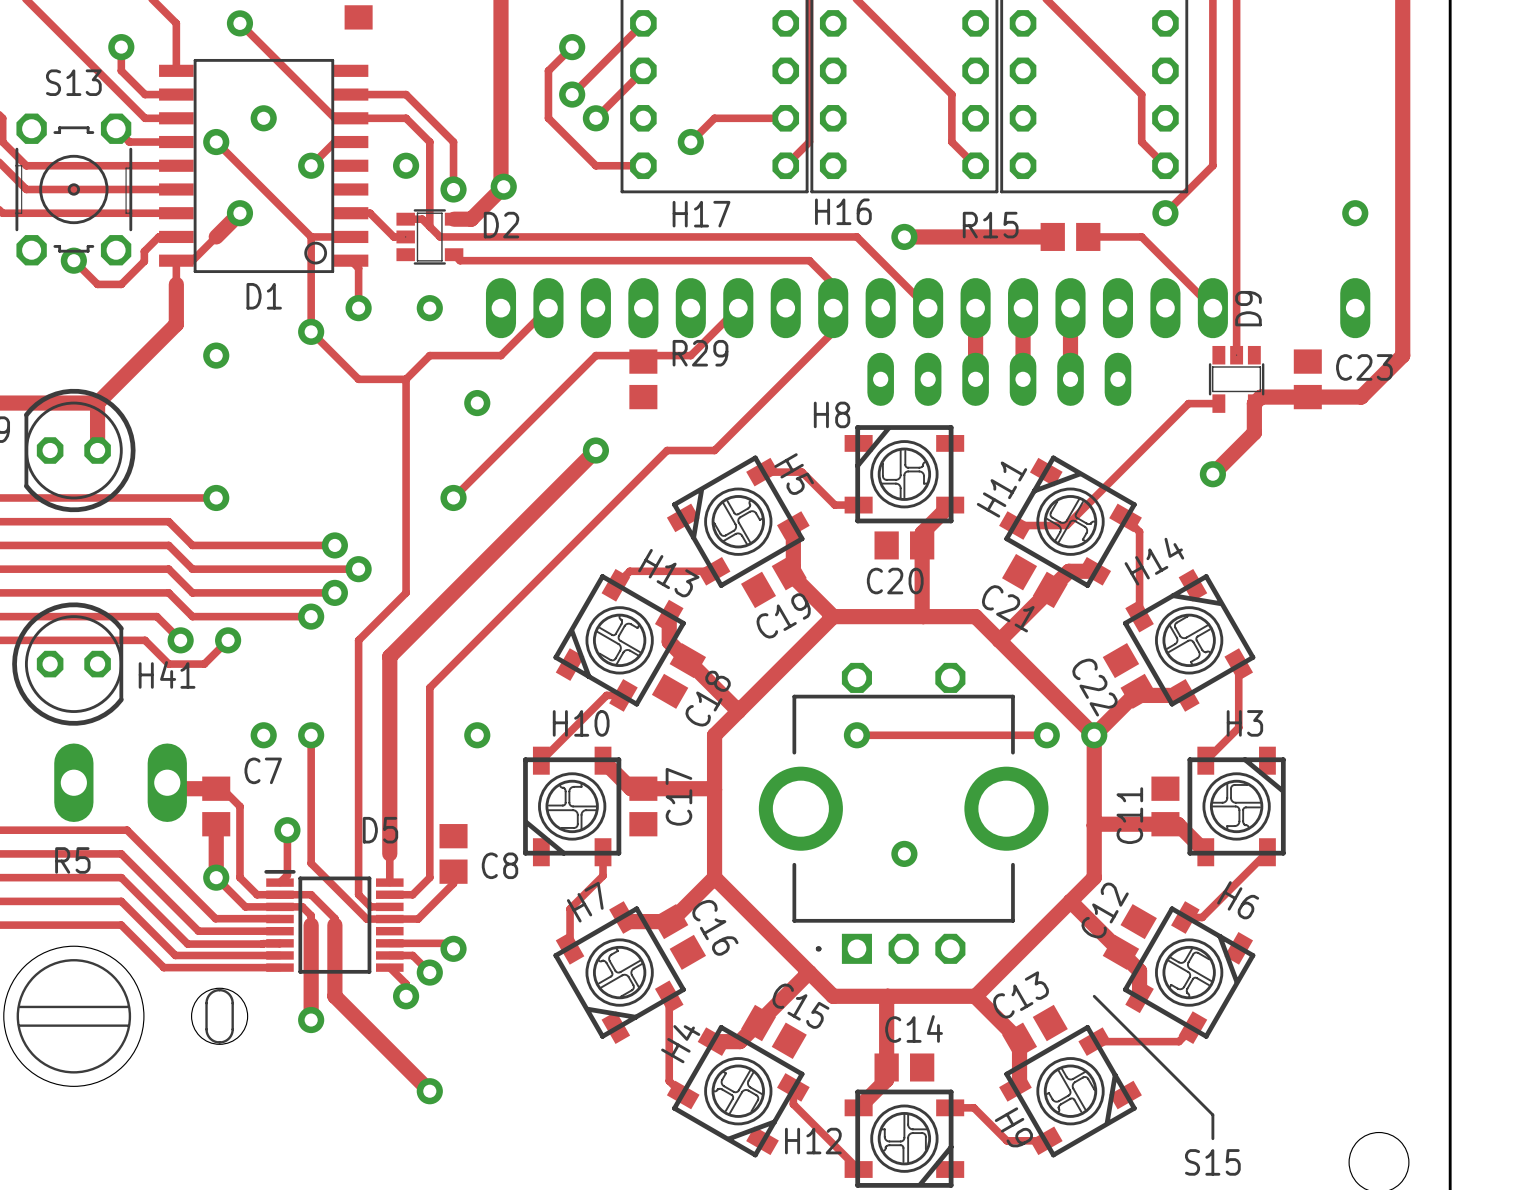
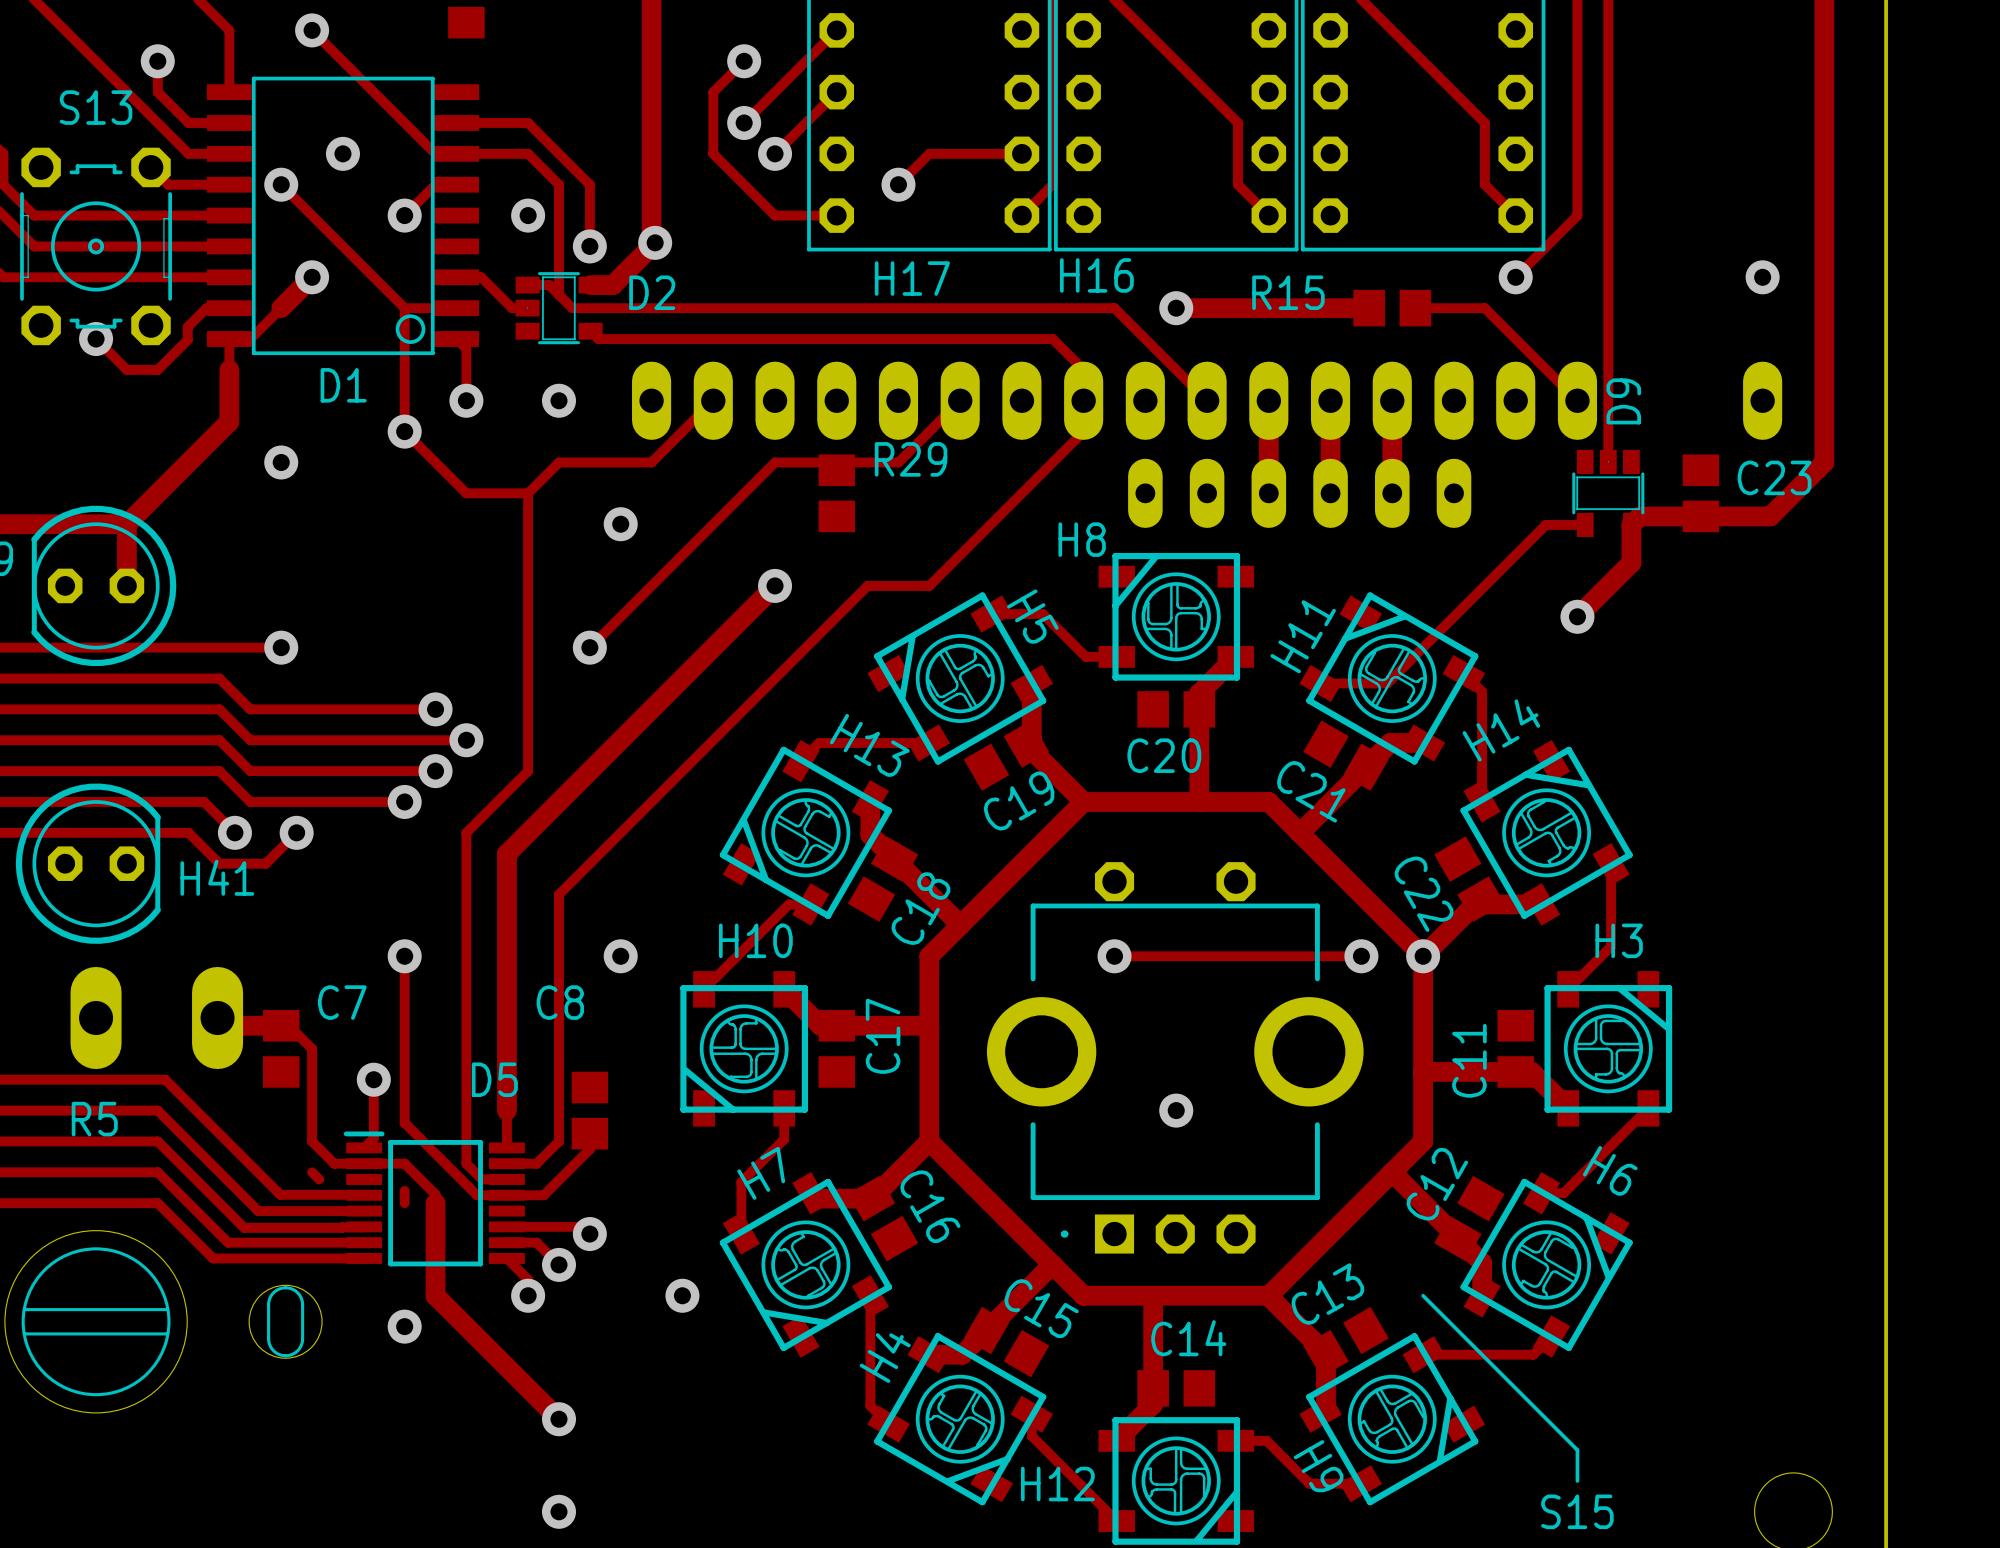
via: (263, 735) -> none
track: (216, 824) (216, 877) (239, 901) -> none
C8 name position: C8 (499, 865) -> C8 (560, 1002)
via: (216, 877) -> none
track: (245, 906) (302, 906) (311, 915) -> none
track: (311, 925) (311, 1020) -> none
via: none -> (682, 1295)
via: none -> (558, 1511)

